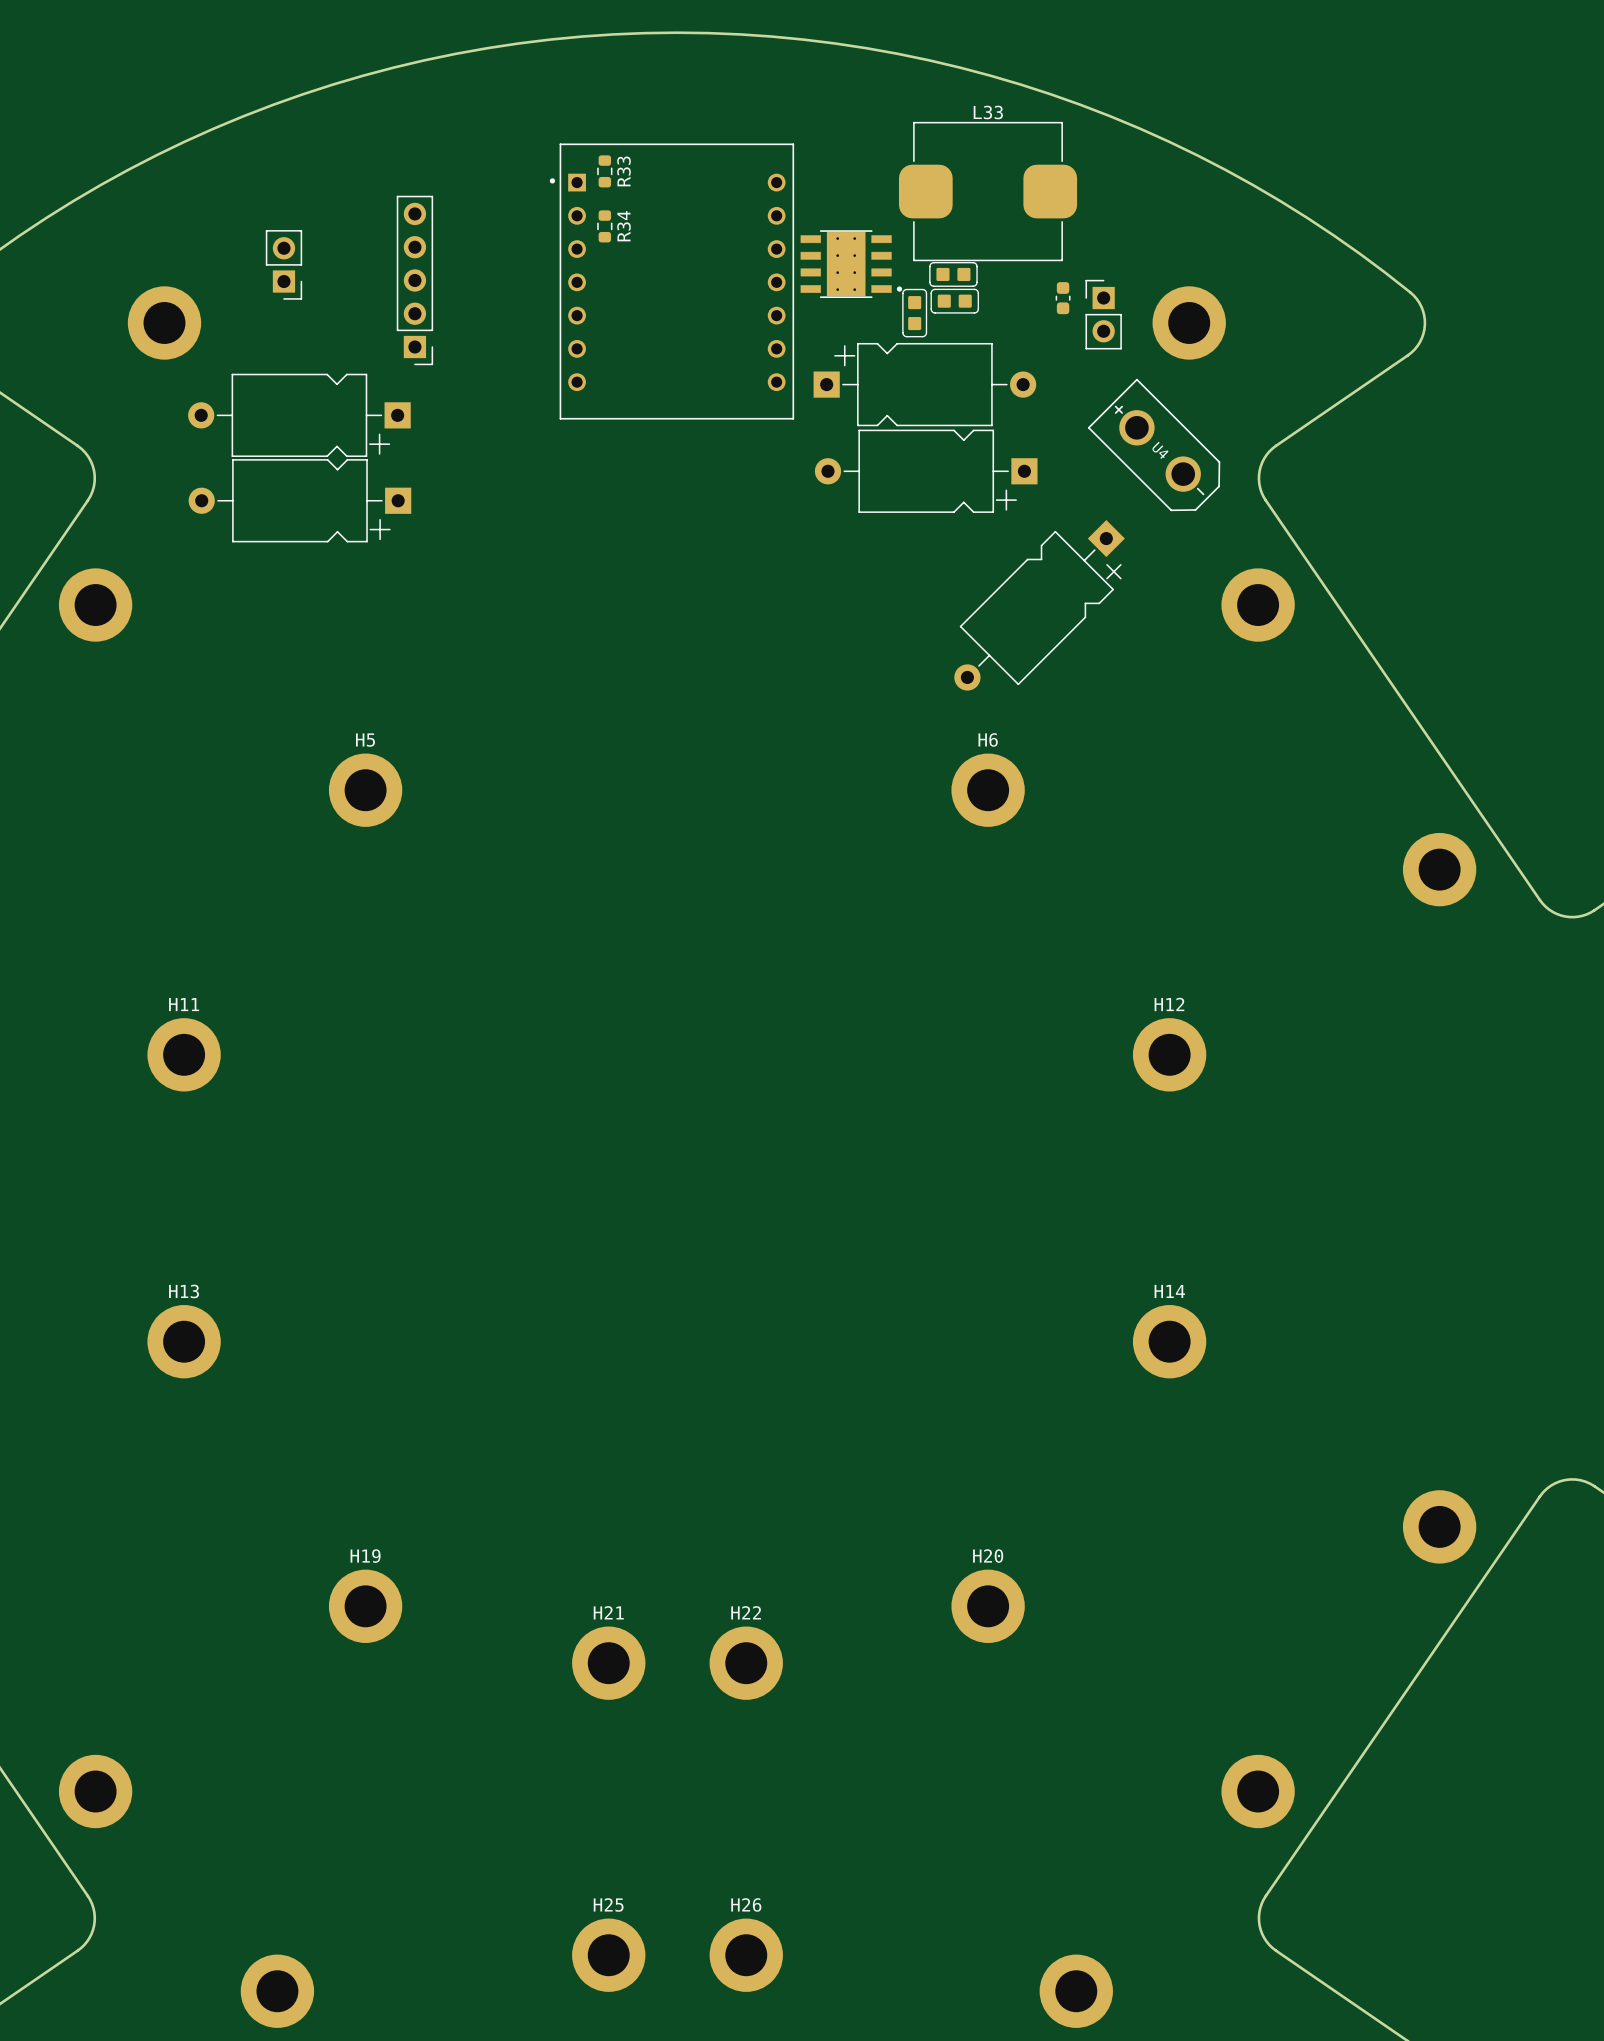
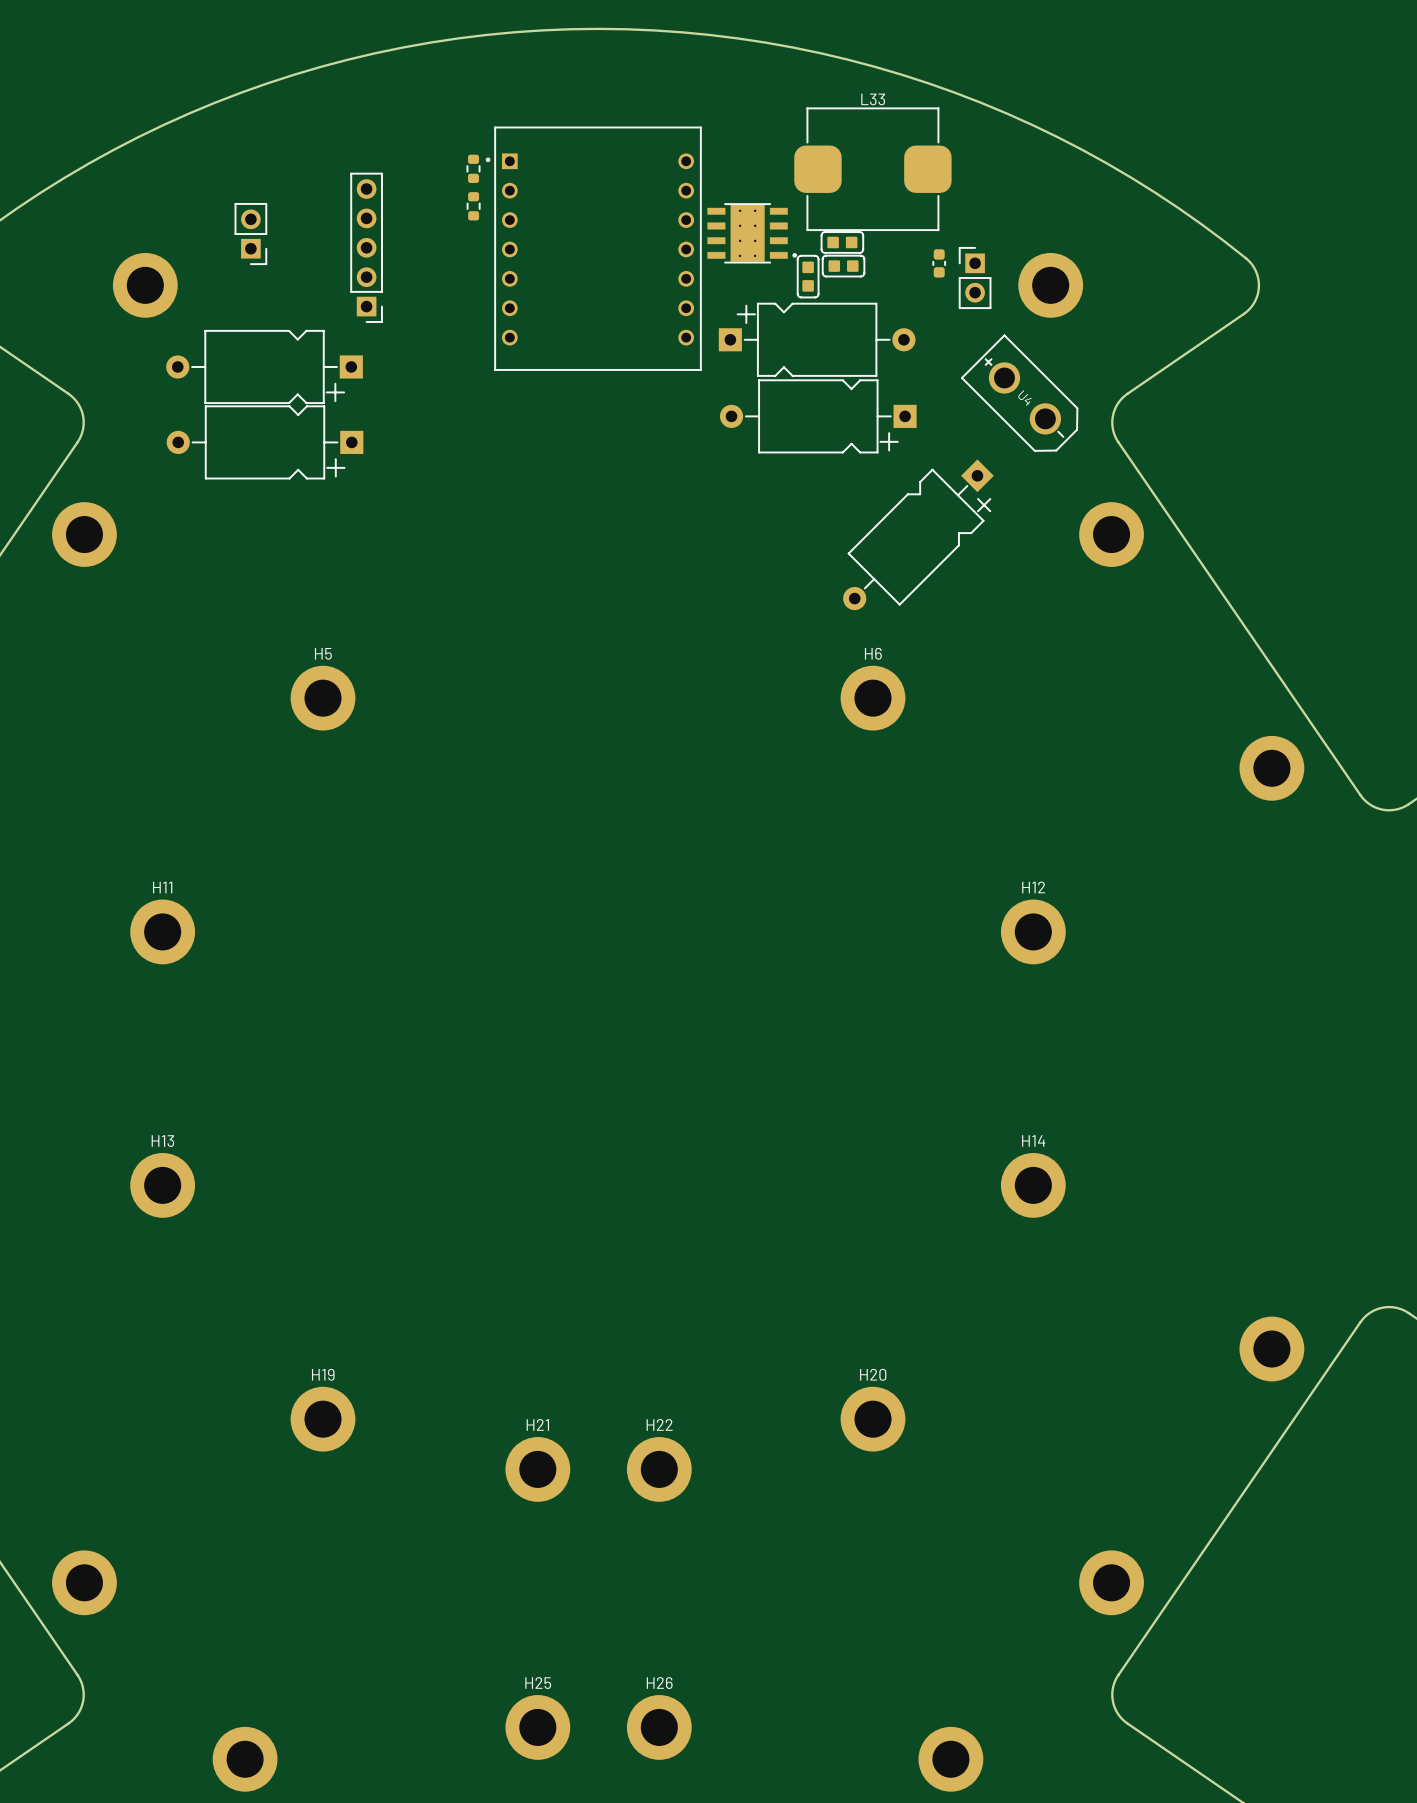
R33: (604, 171) -> none
part: none -> (473, 168)
R34: (604, 226) -> none
part: none -> (473, 206)

